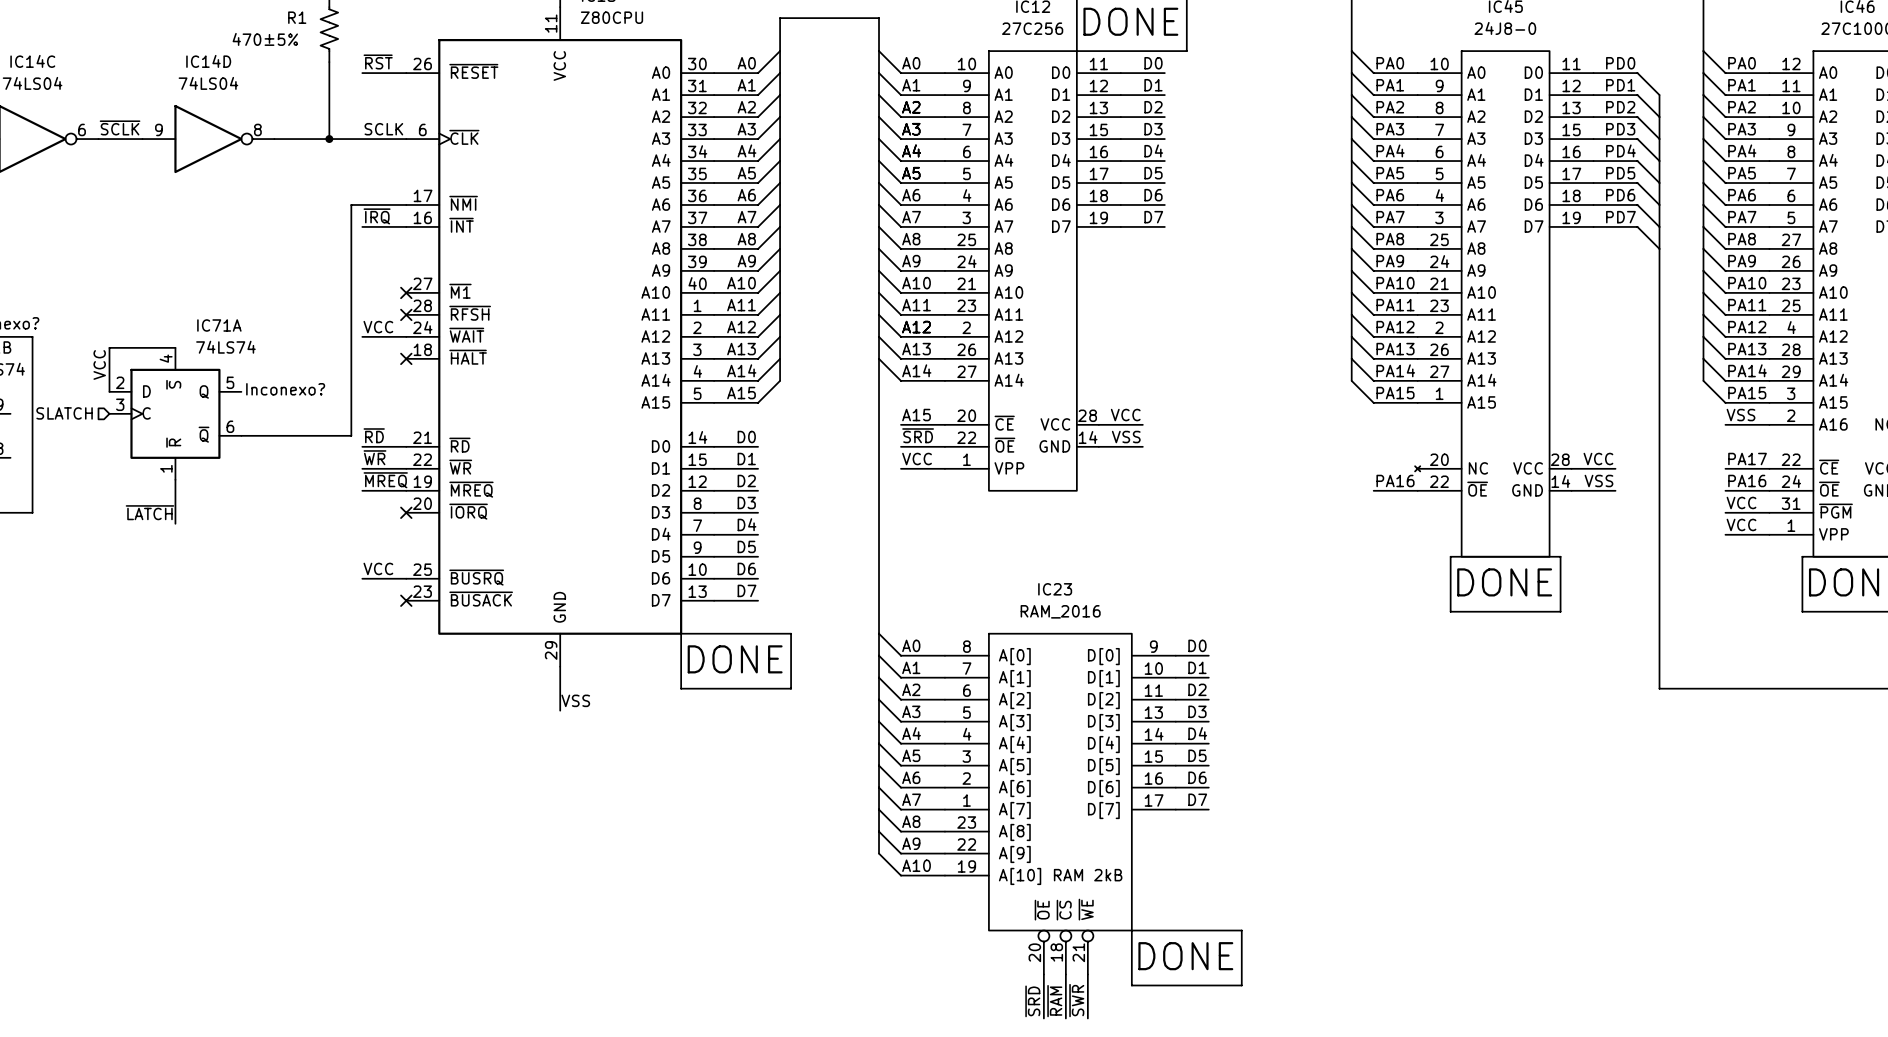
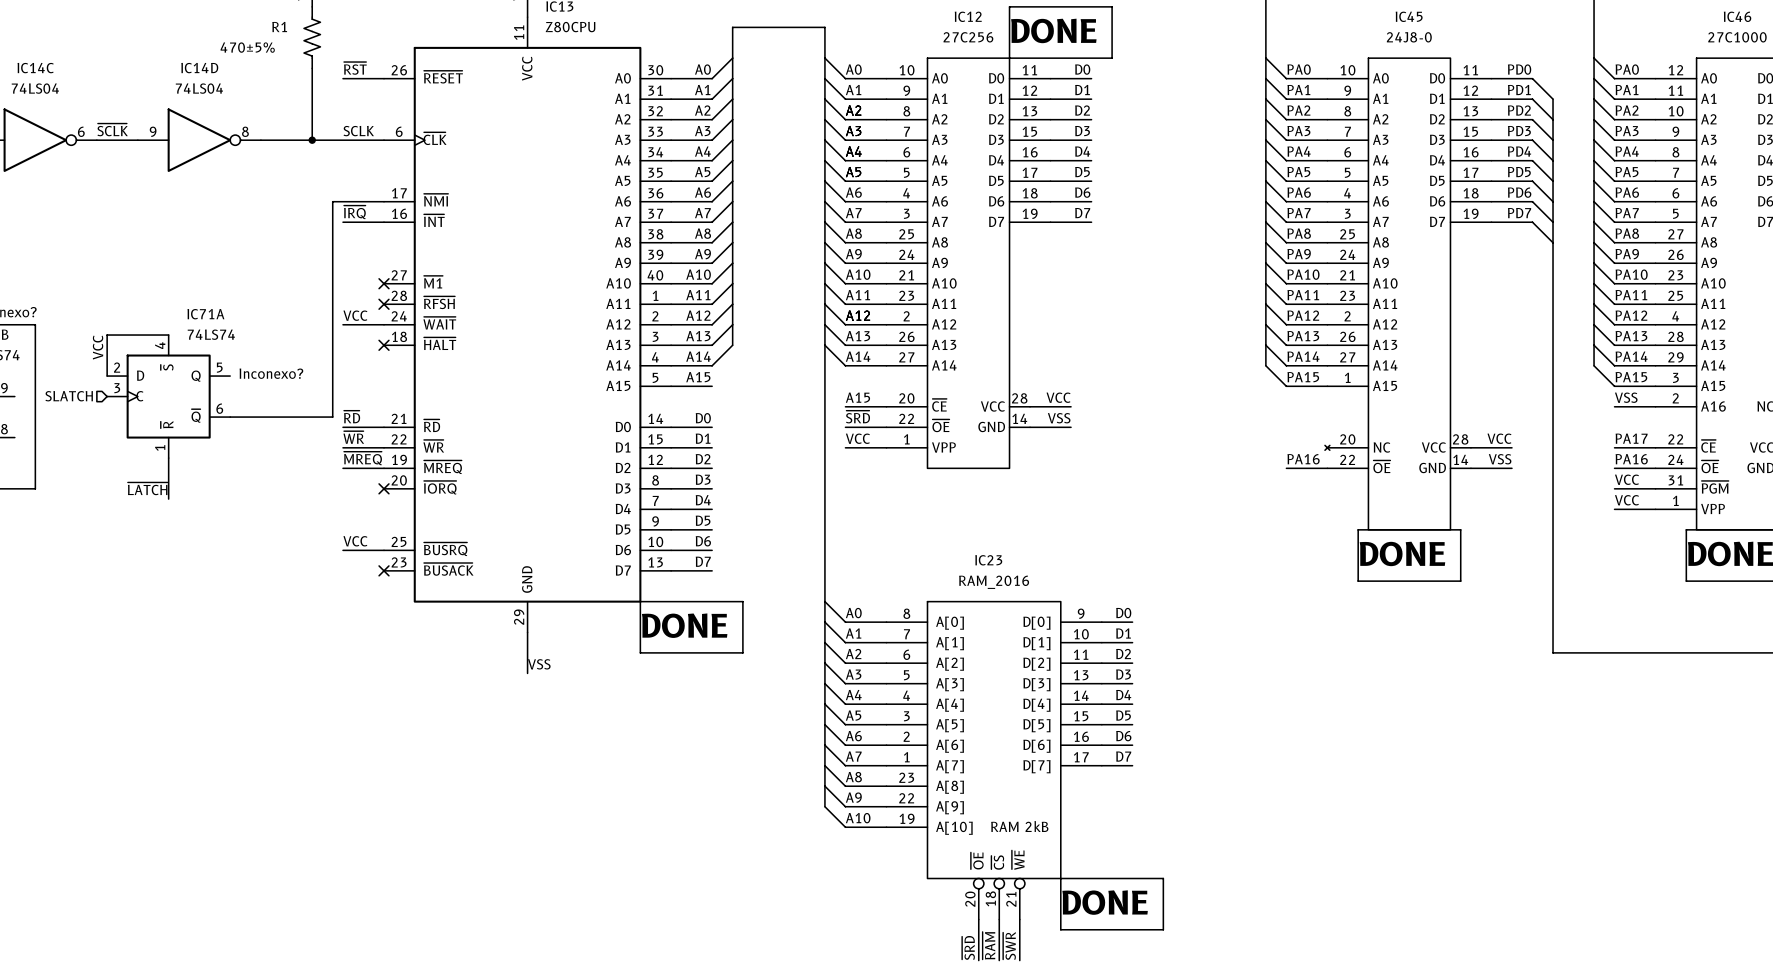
bus: (780, 358) (780, 380) -> none
wire: (780, 380) (758, 402) -> none

